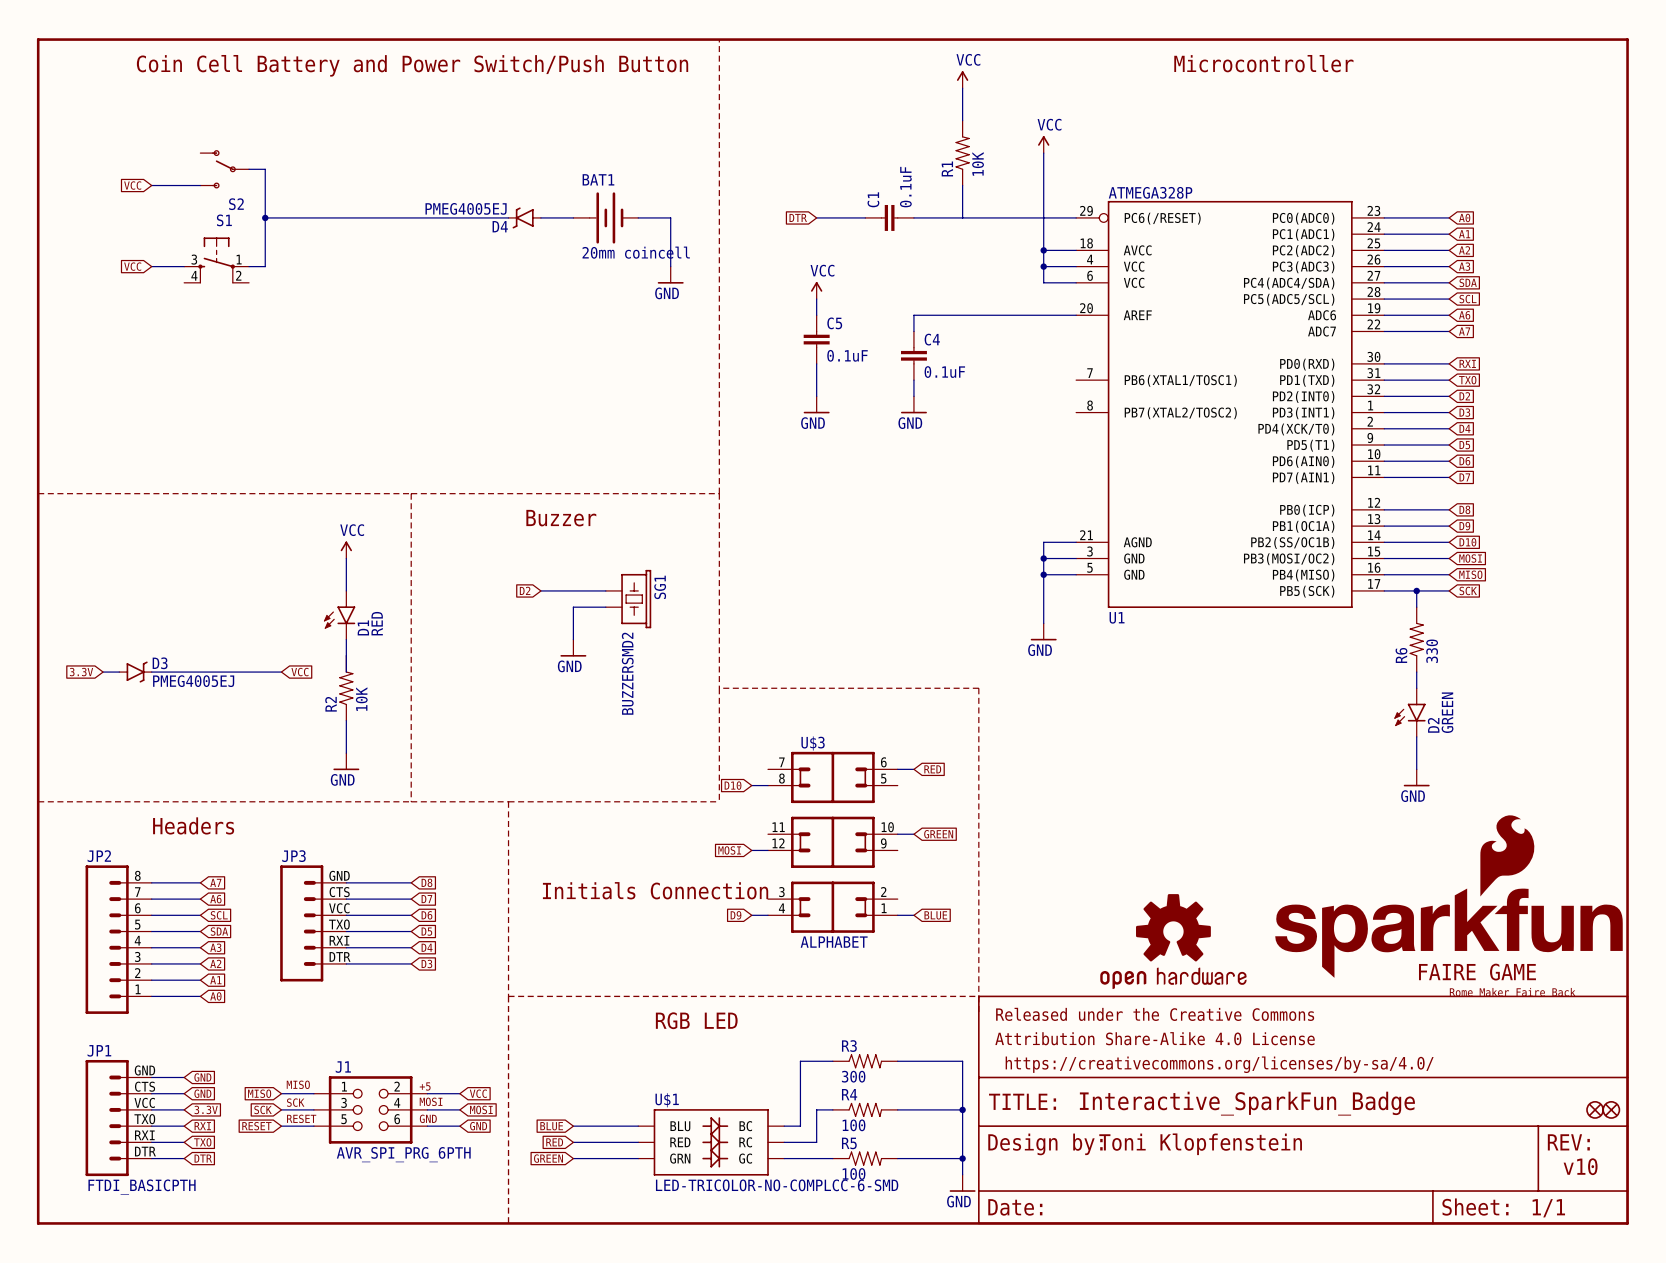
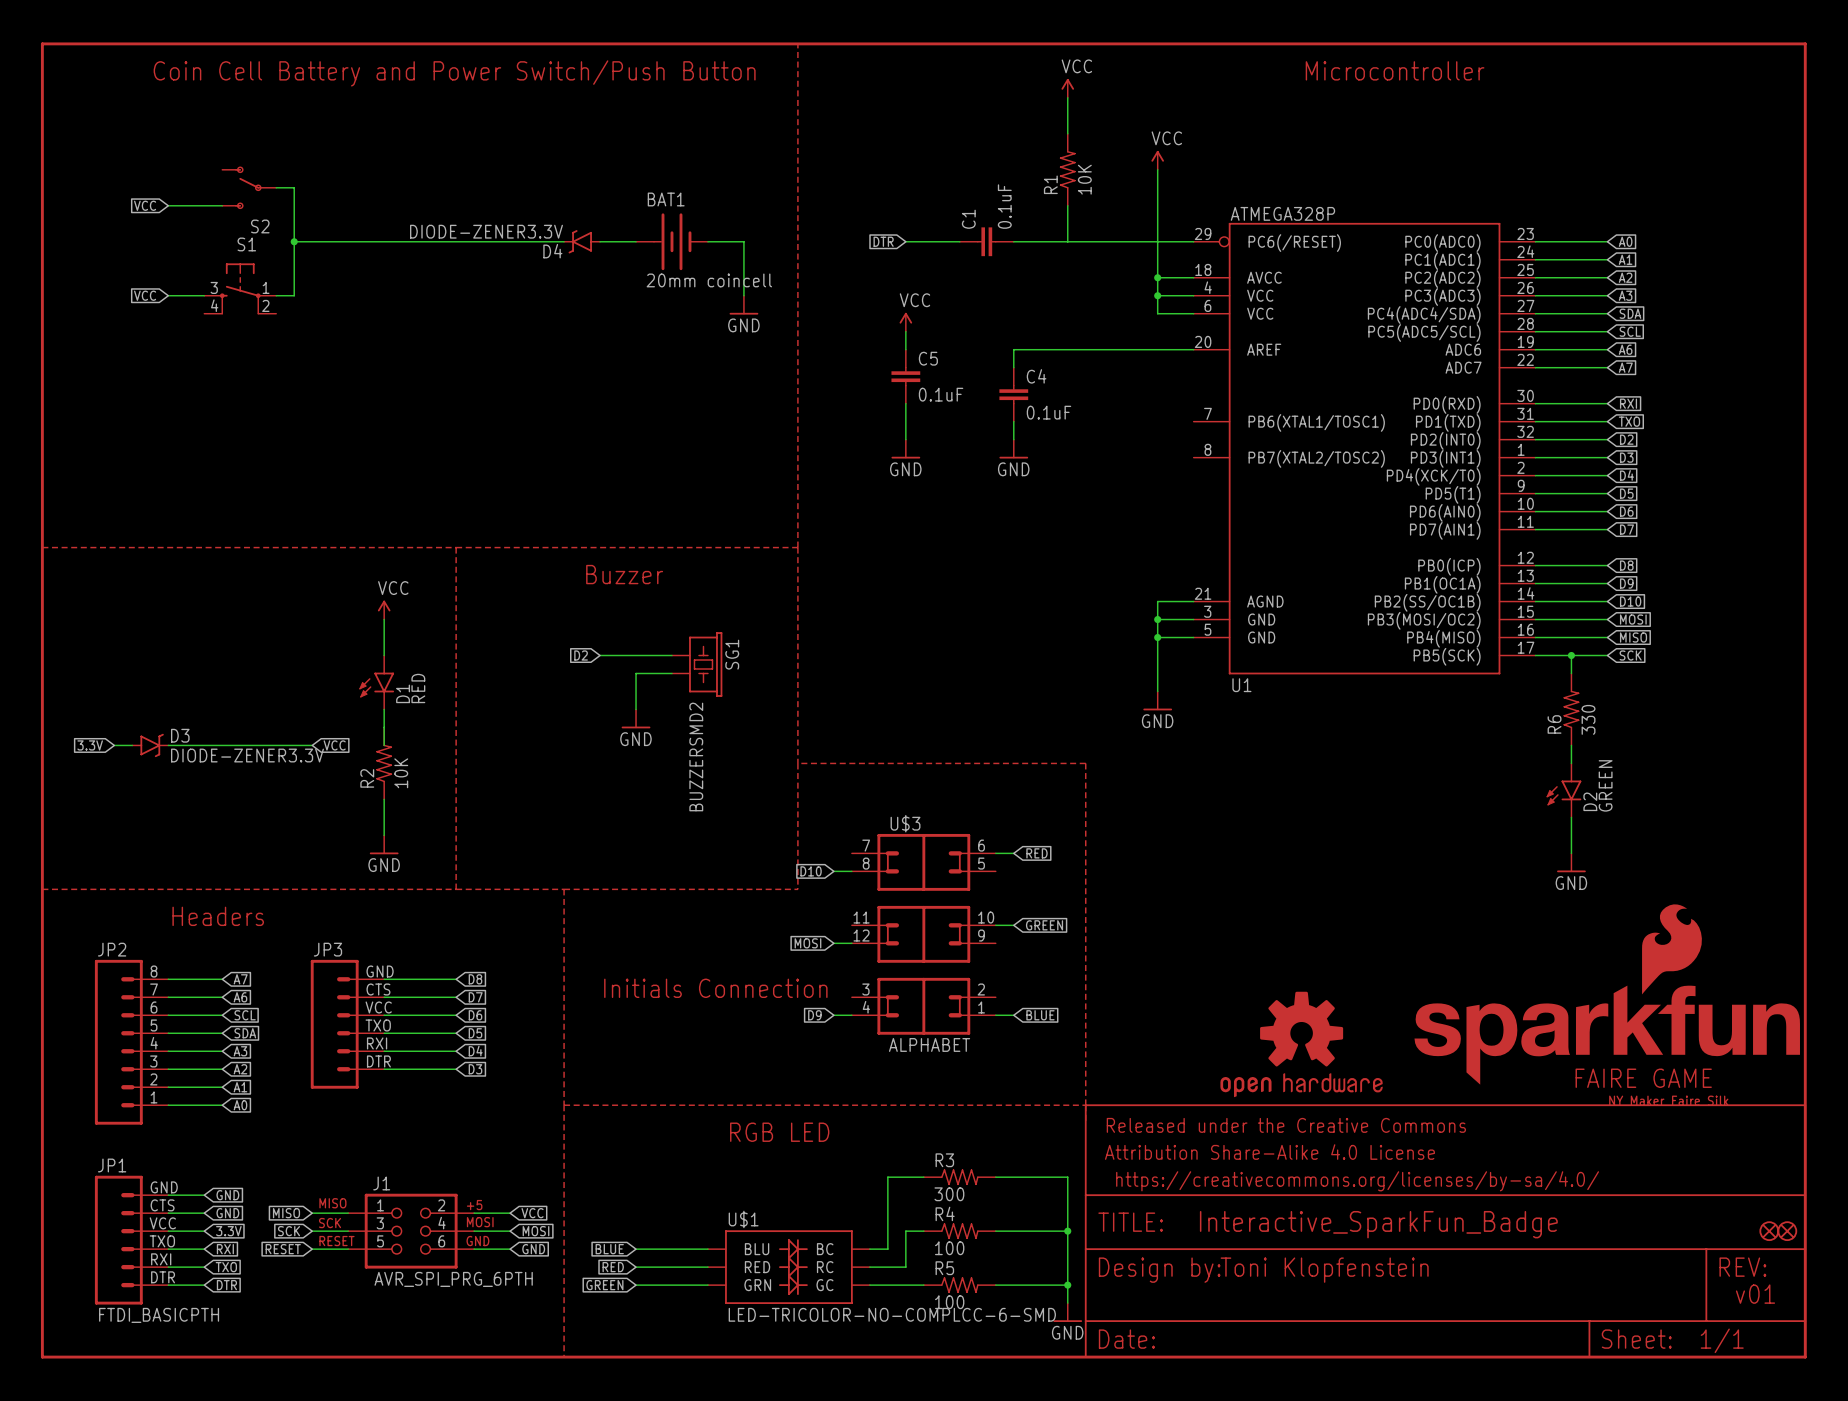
D4 value: PMEG4005EJ (466, 208) -> DIODE-ZENER3.3V (486, 231)
D3 value: PMEG4005EJ (193, 681) -> DIODE-ZENER3.3V (247, 755)
part: none -> (1668, 1100)
part: (1512, 992) -> none
text: v10 (1580, 1166) -> v01 (1755, 1294)

